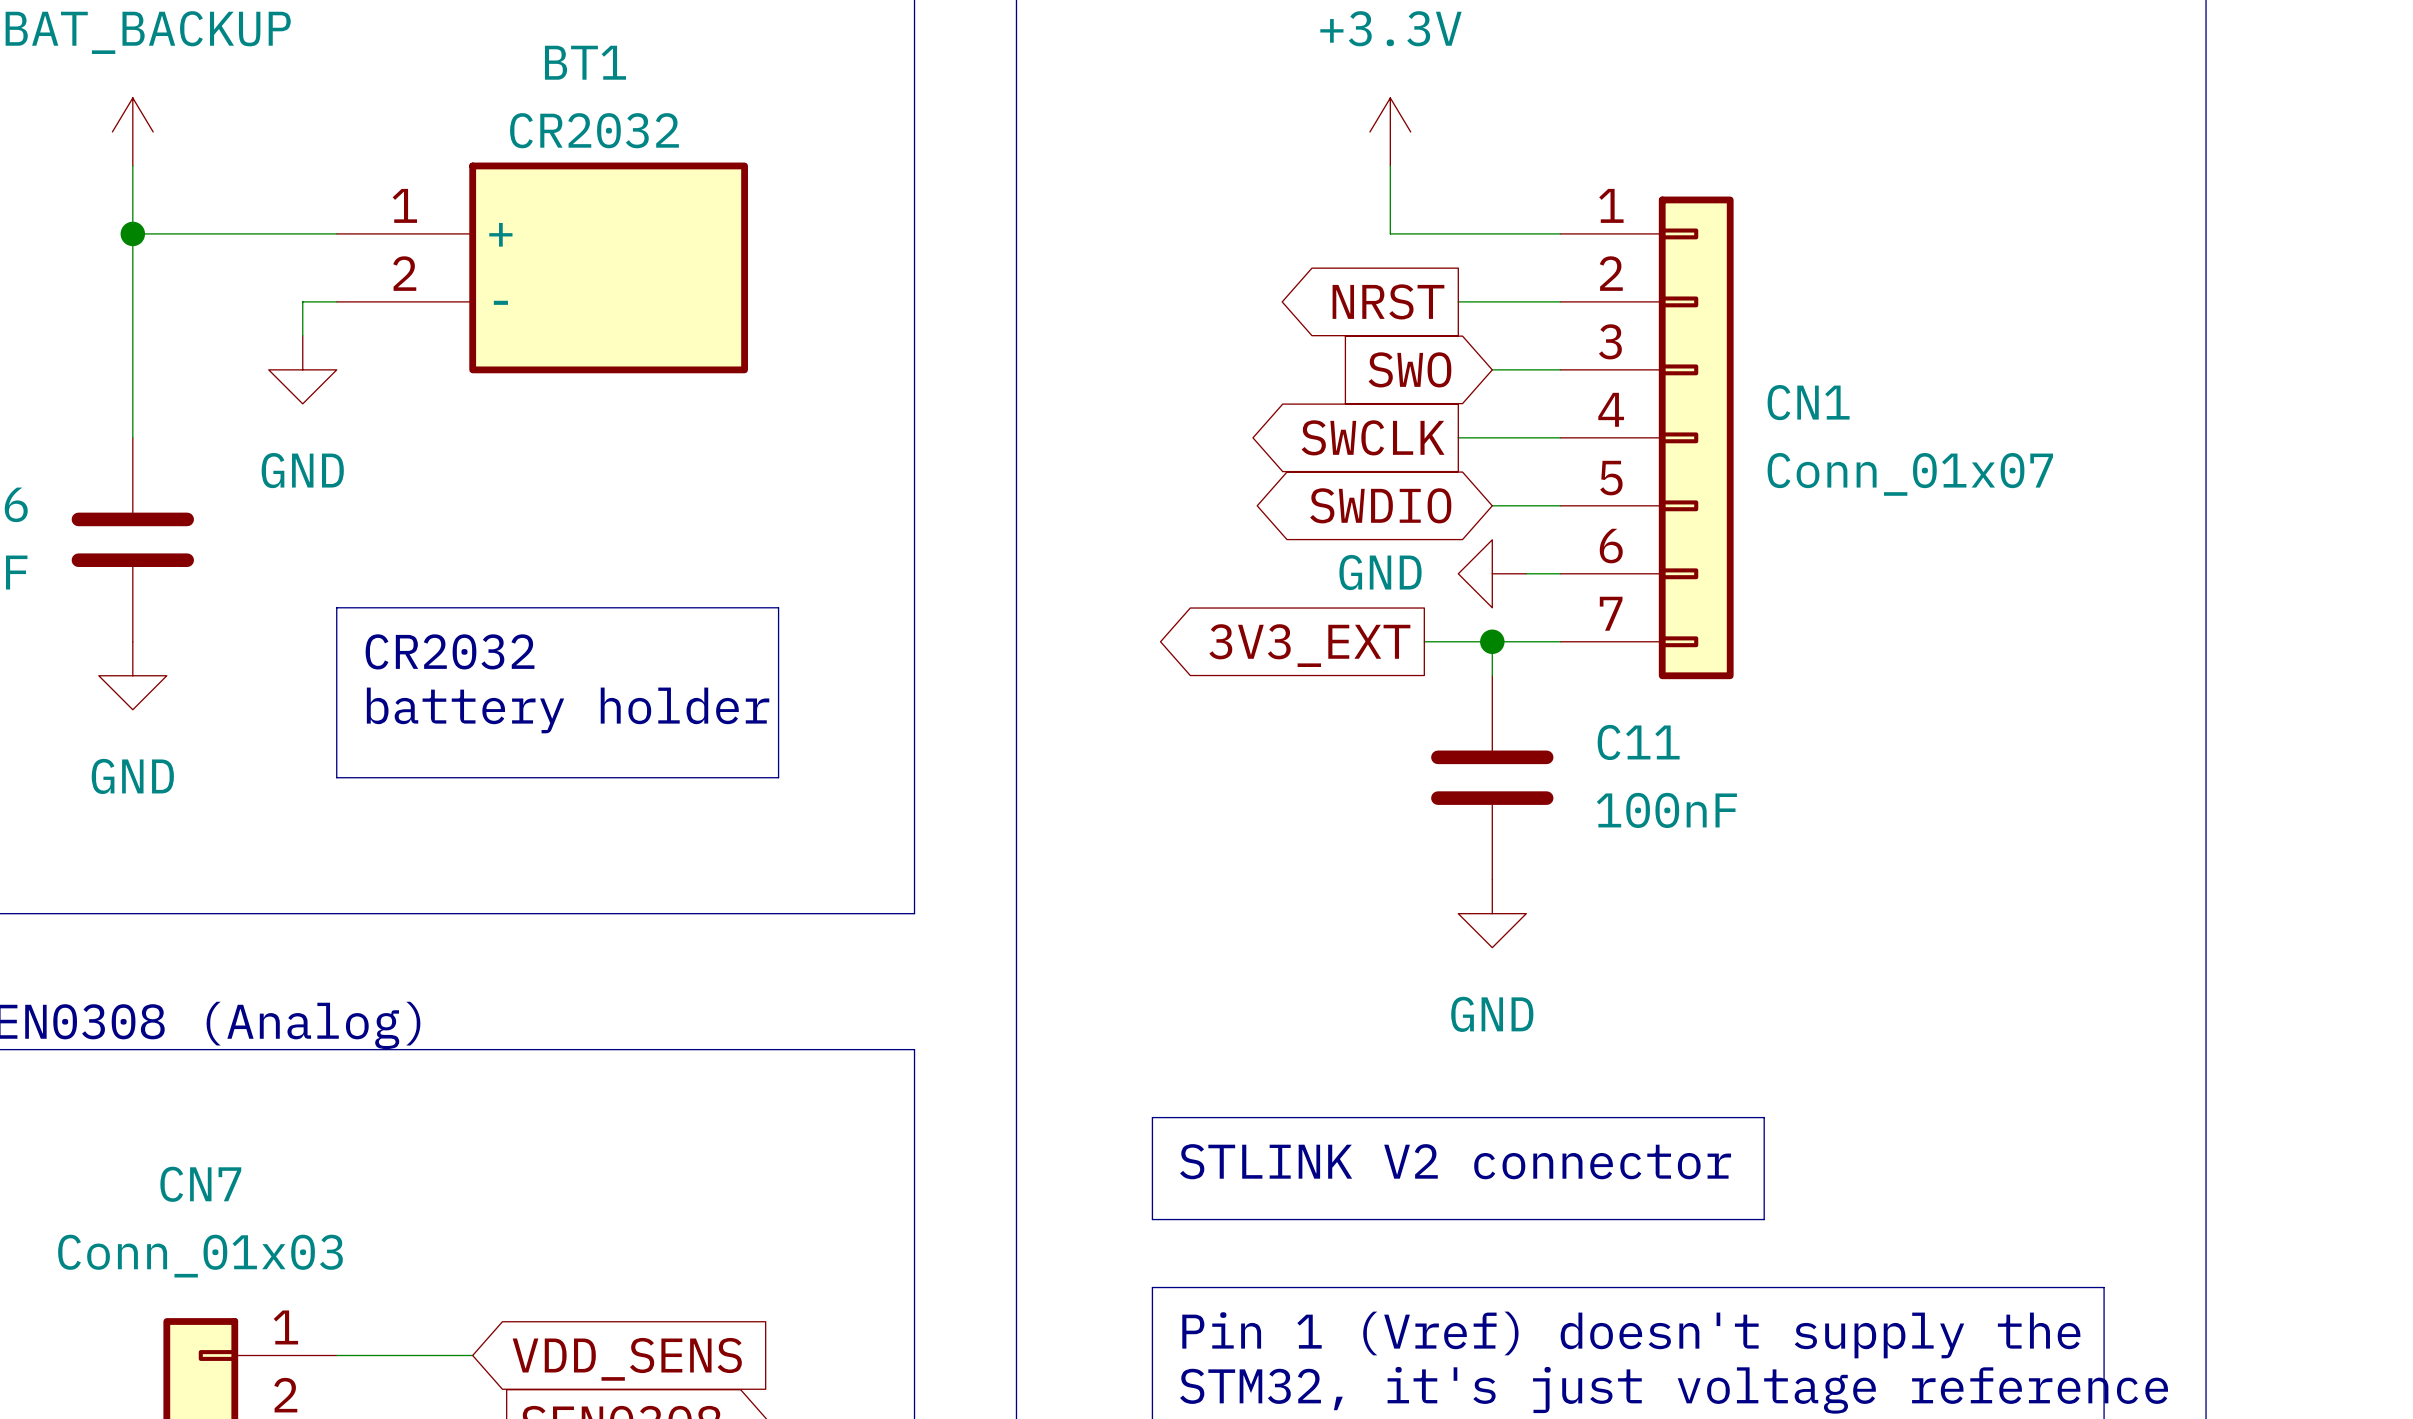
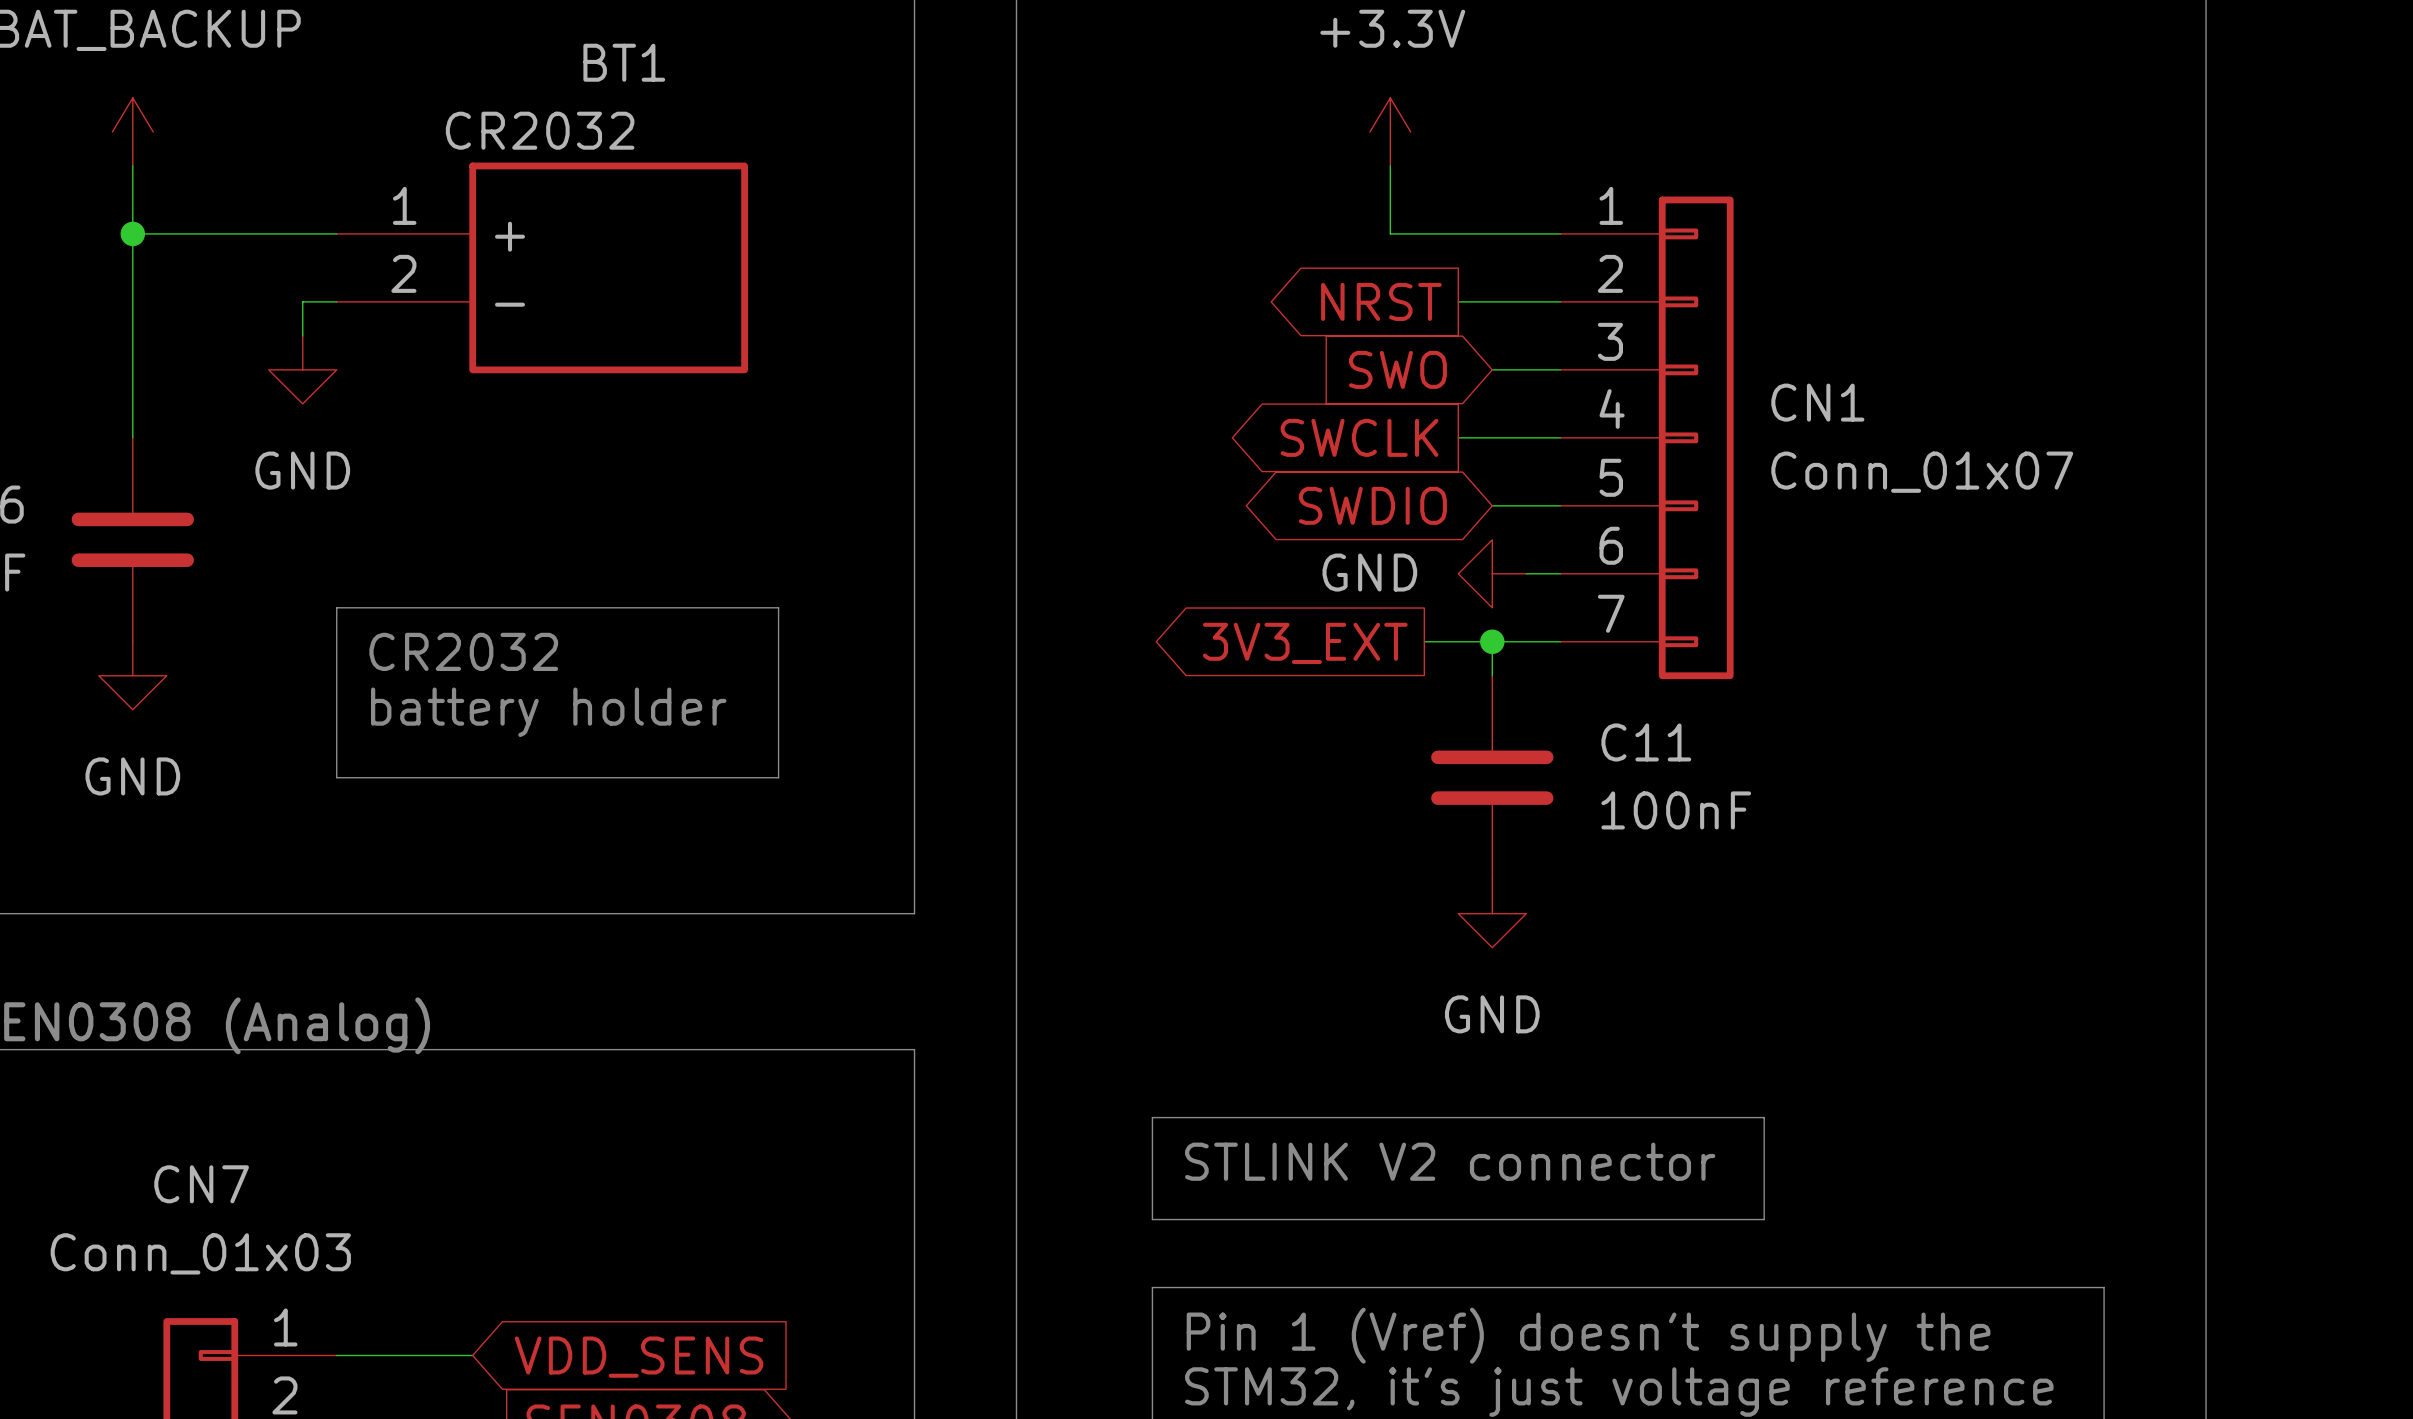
BT1 name position: BT1 (585, 62) -> BT1 (624, 62)
BT1 value position: CR2032 (594, 130) -> CR2032 (540, 130)

